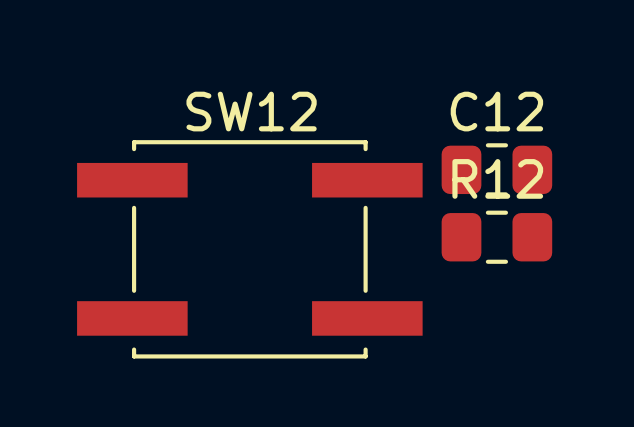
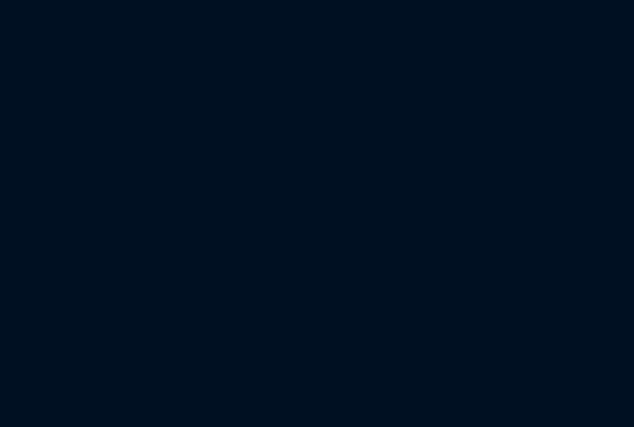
C12: (496, 169) -> none
R12: (496, 237) -> none
SW12: (249, 249) -> none

